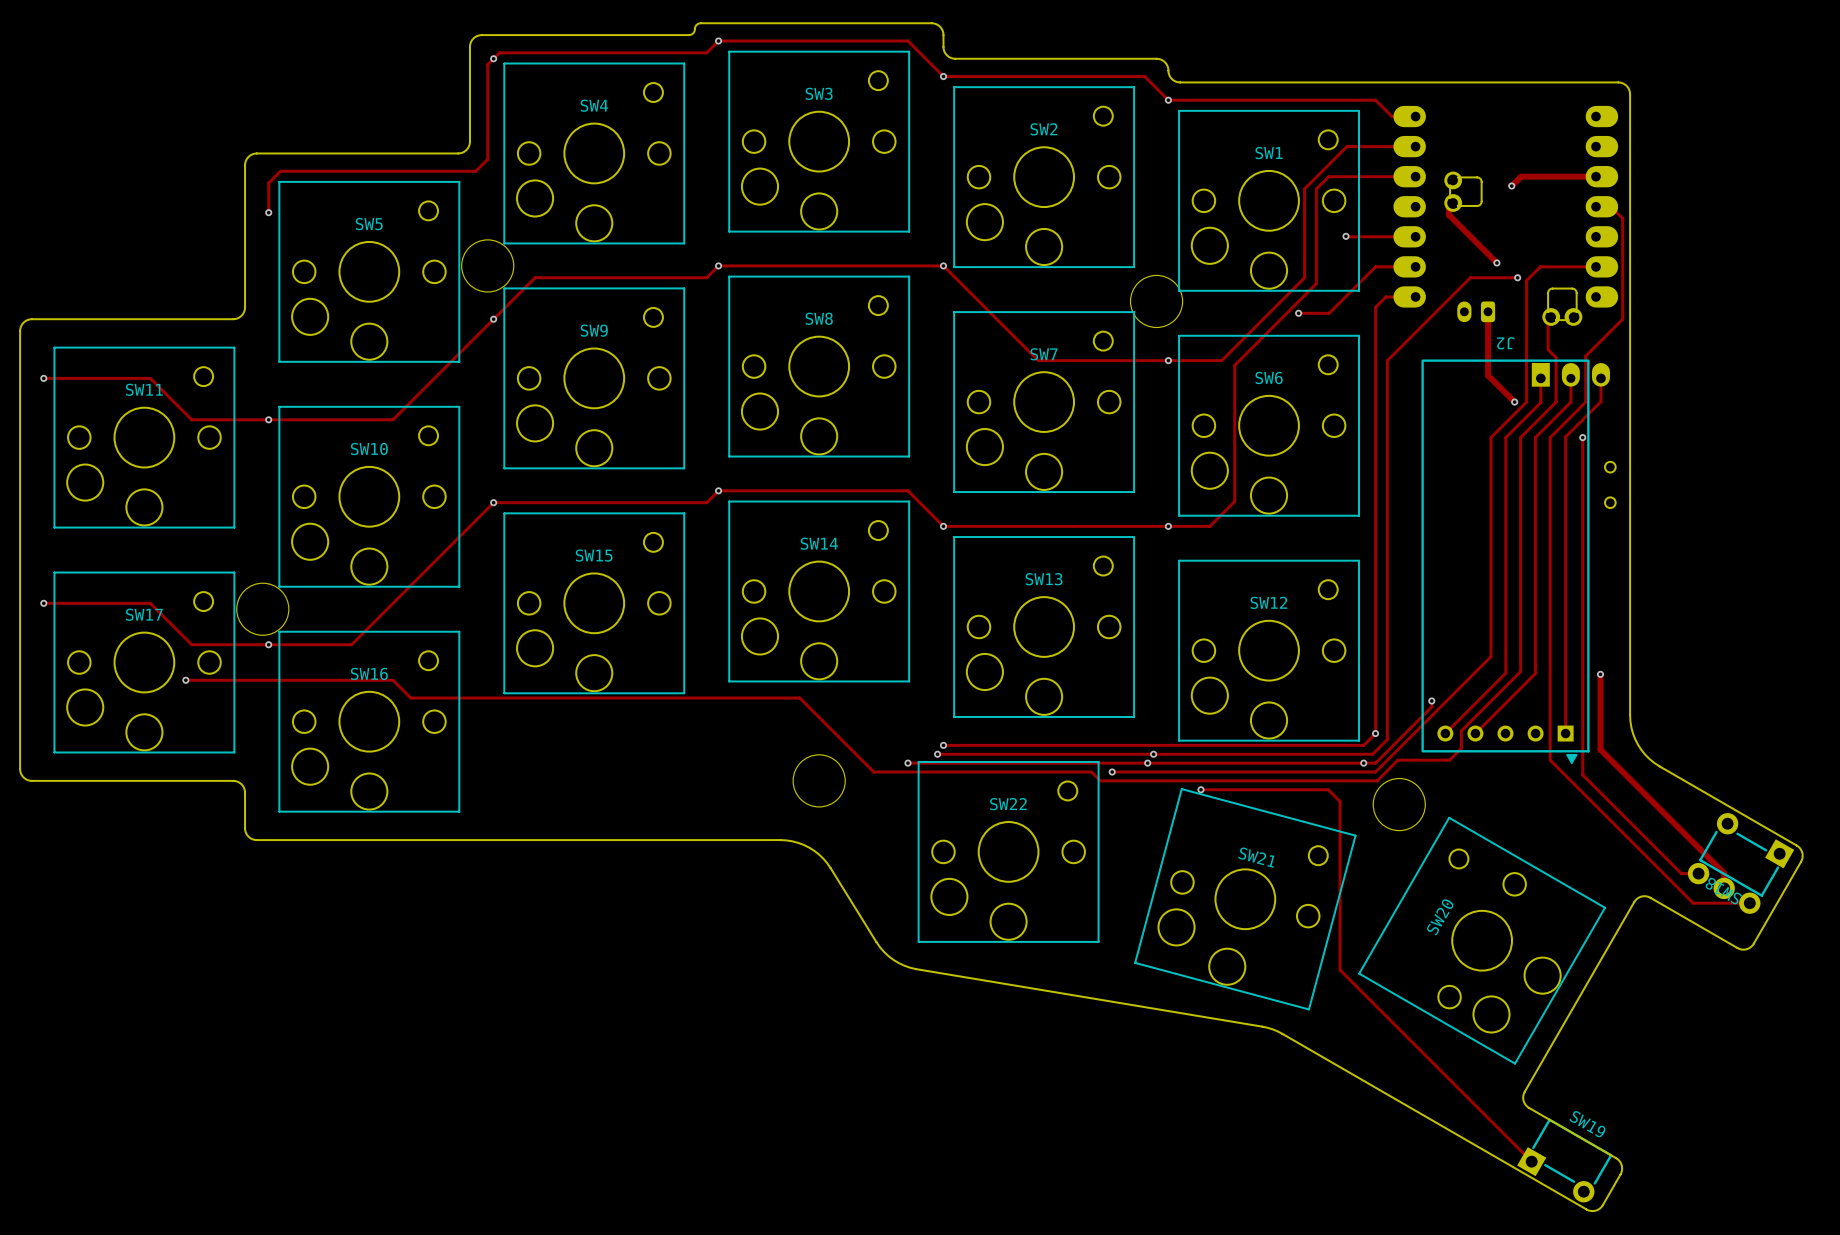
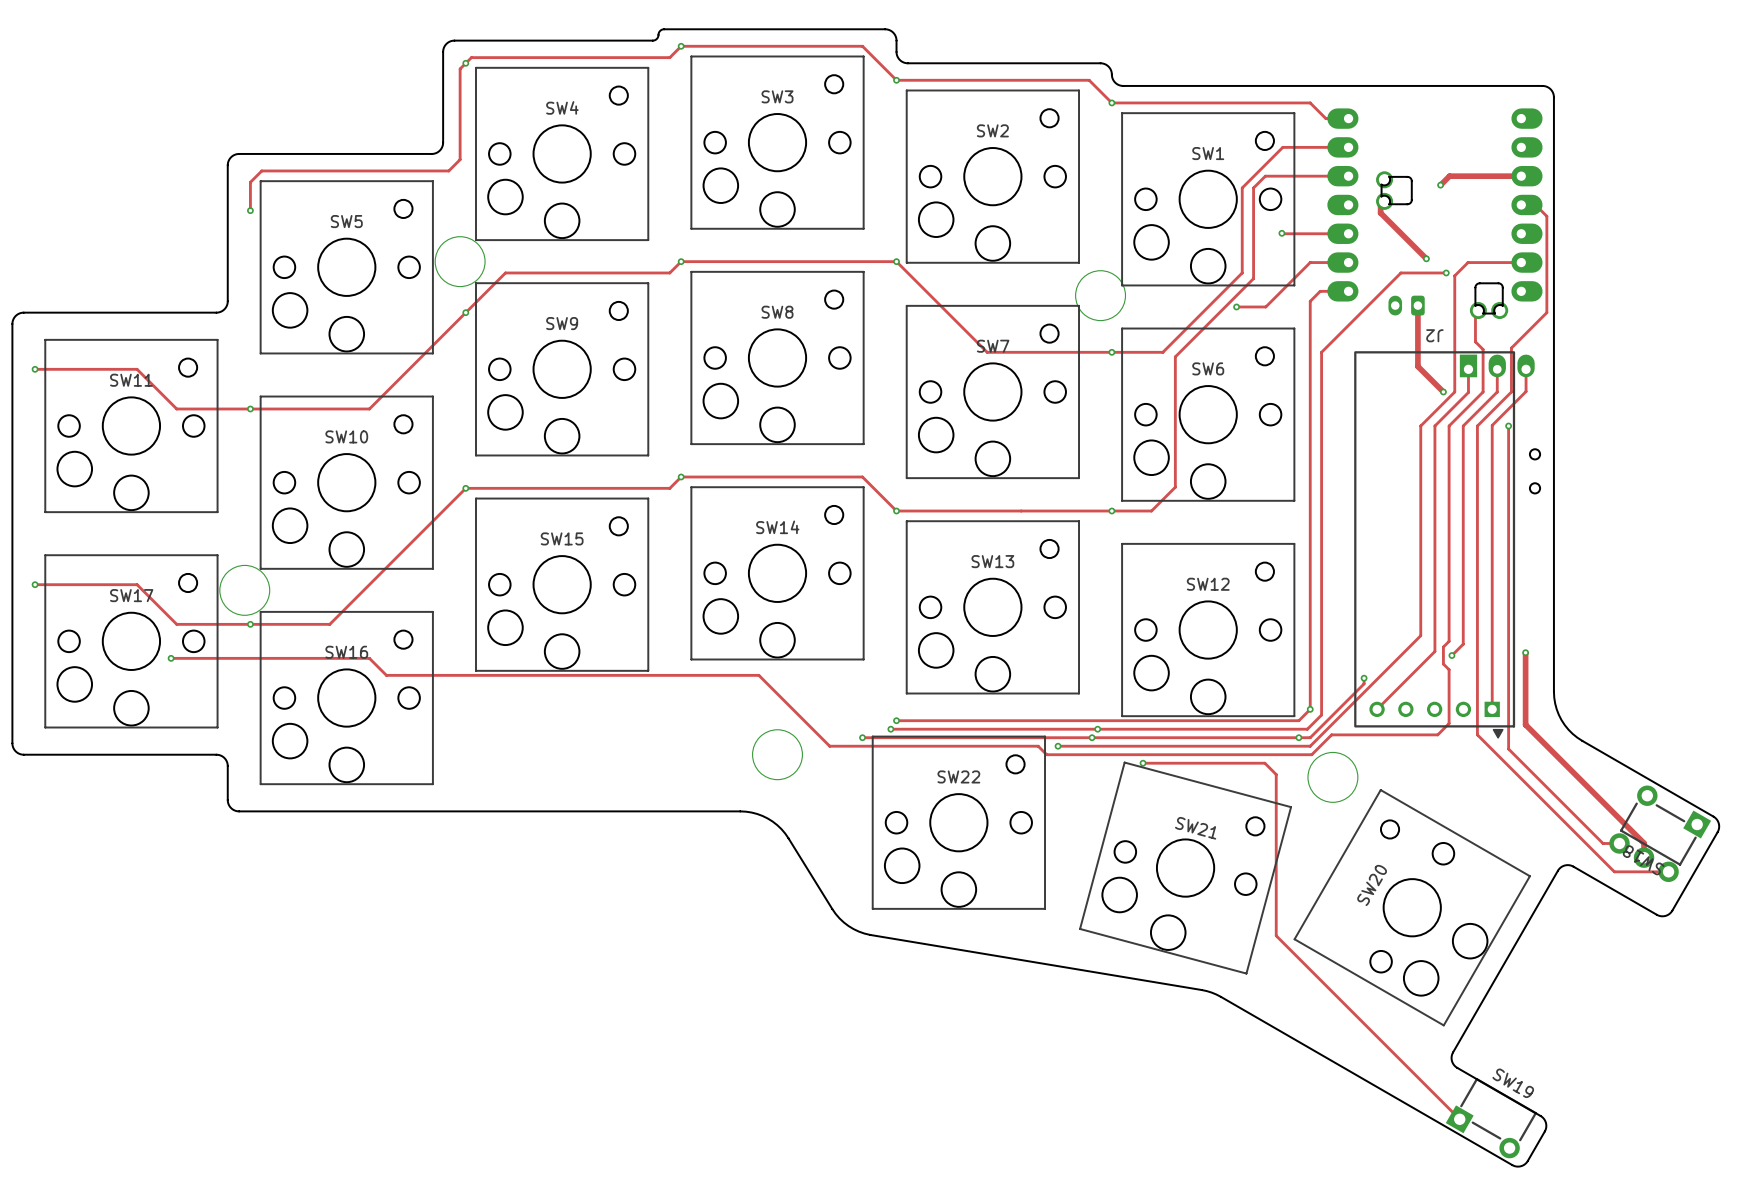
track: (1520, 662) (1520, 671) (1461, 730) (1461, 748) (1449, 760) -> (1449, 641) (1443, 647) (1443, 664) (1449, 669) (1449, 723) (1437, 734) (1381, 734)
track: (1535, 665) (1535, 673) (1475, 733) -> (1463, 644) (1451, 655)
via: none -> (1451, 655)

